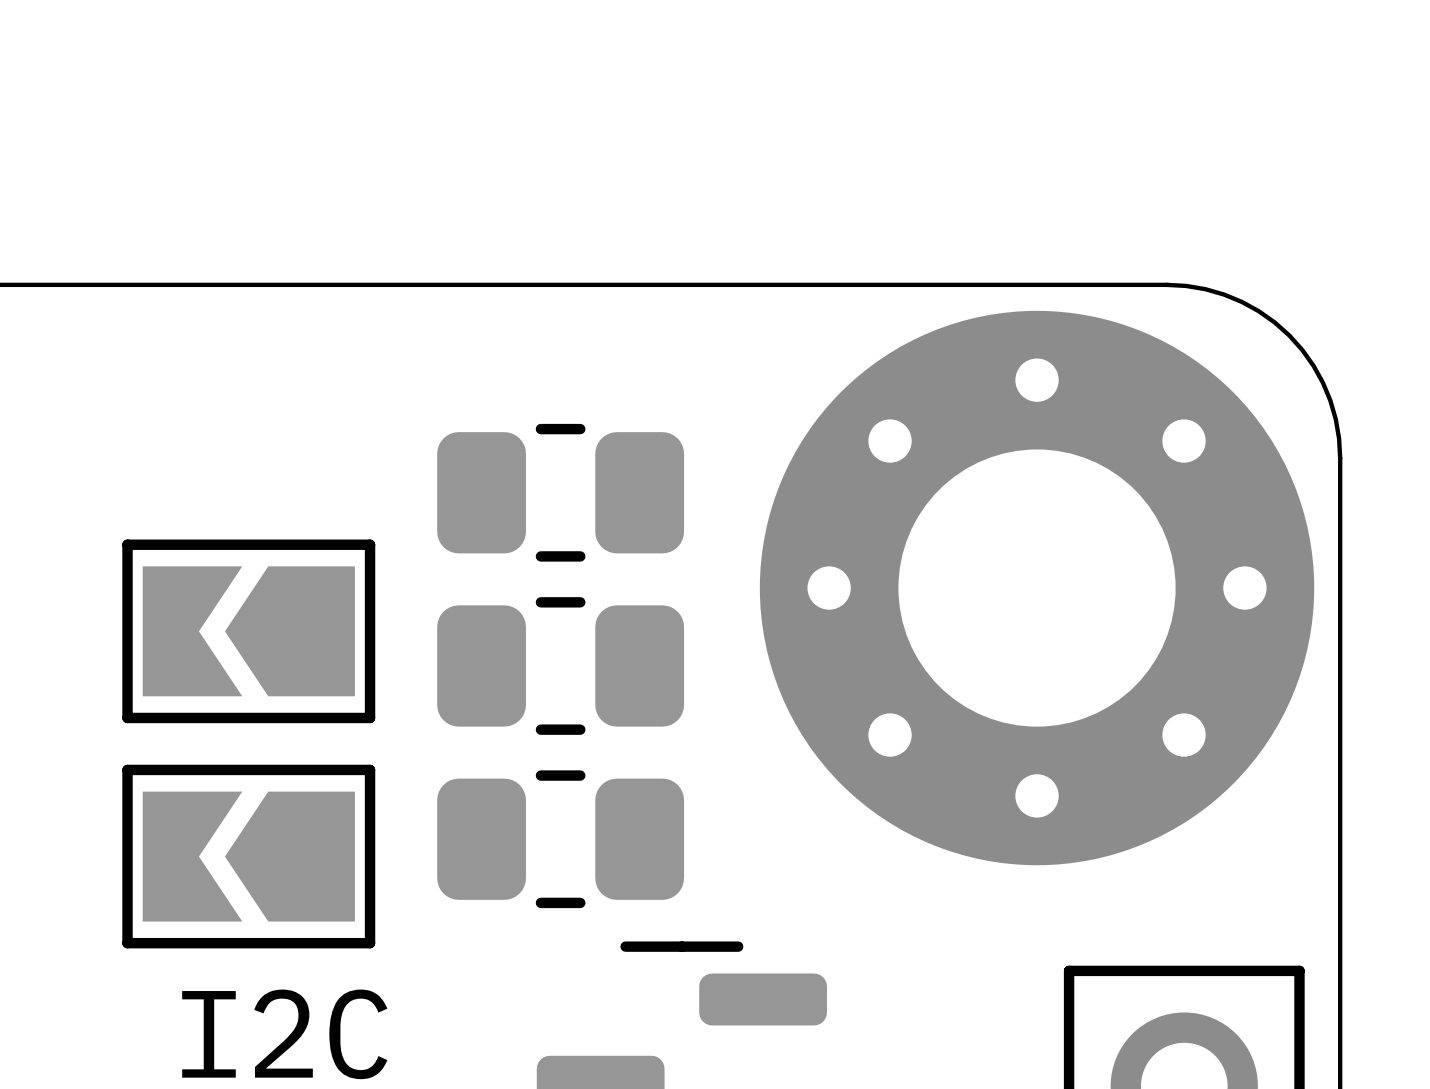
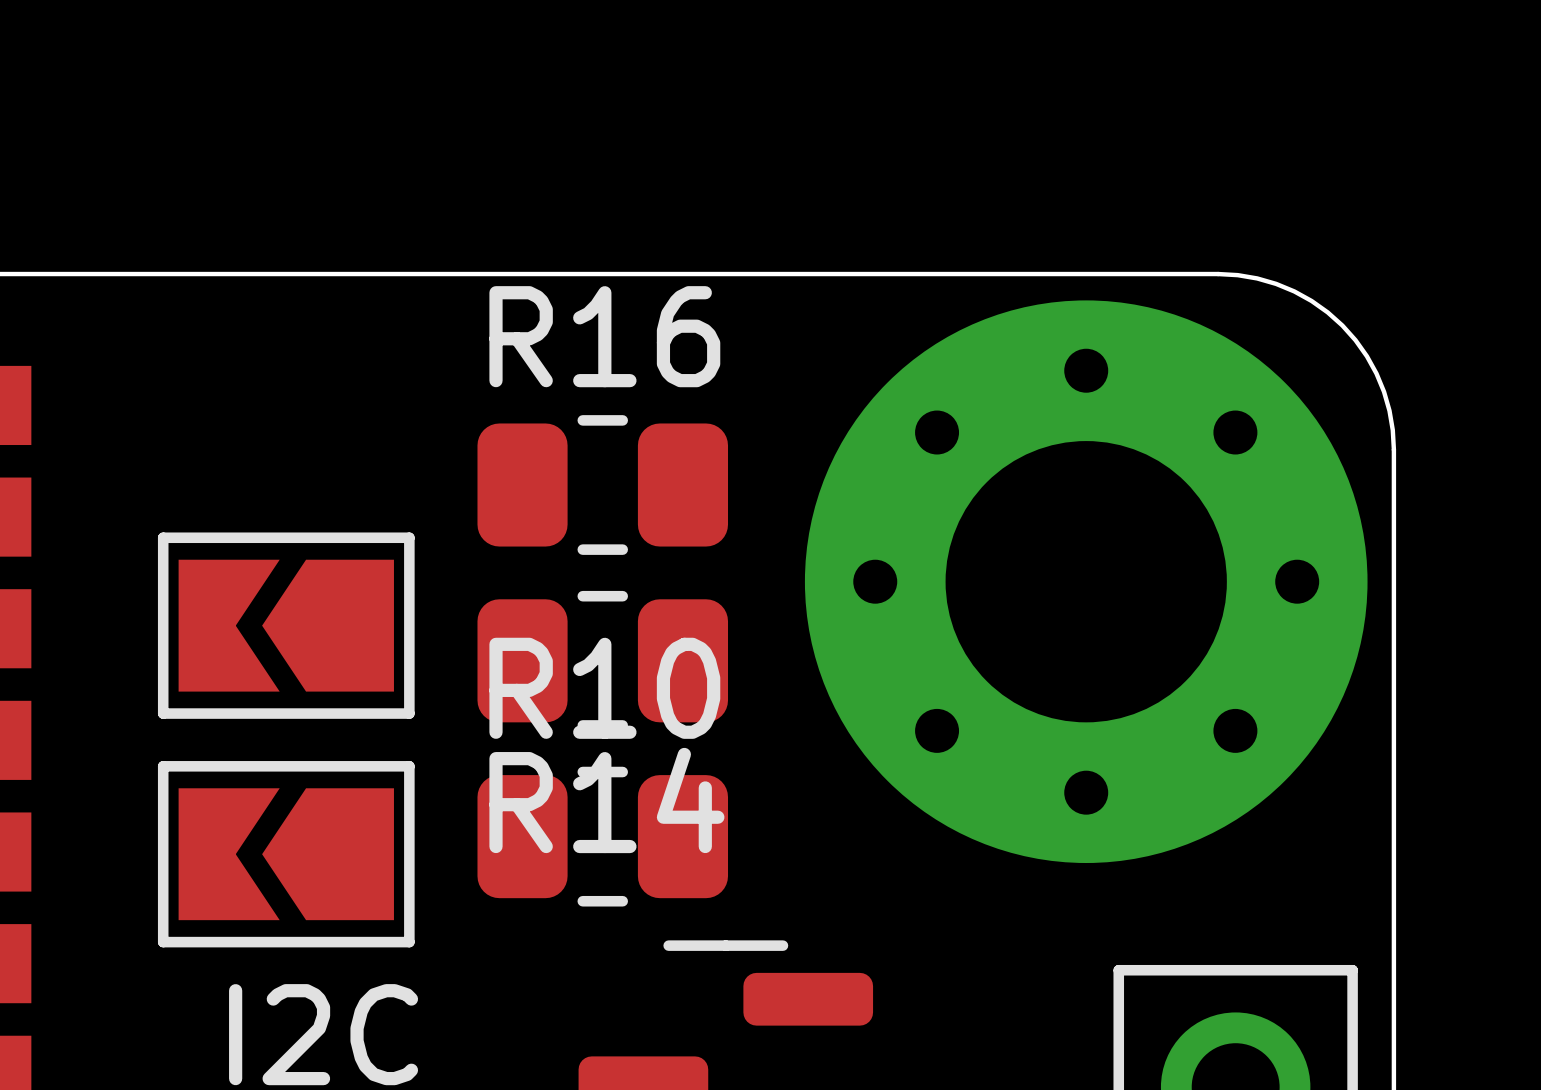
R16 name: none -> R16 (604, 336)
R10 name: none -> R10 (604, 688)
R14 name: none -> R14 (606, 800)

